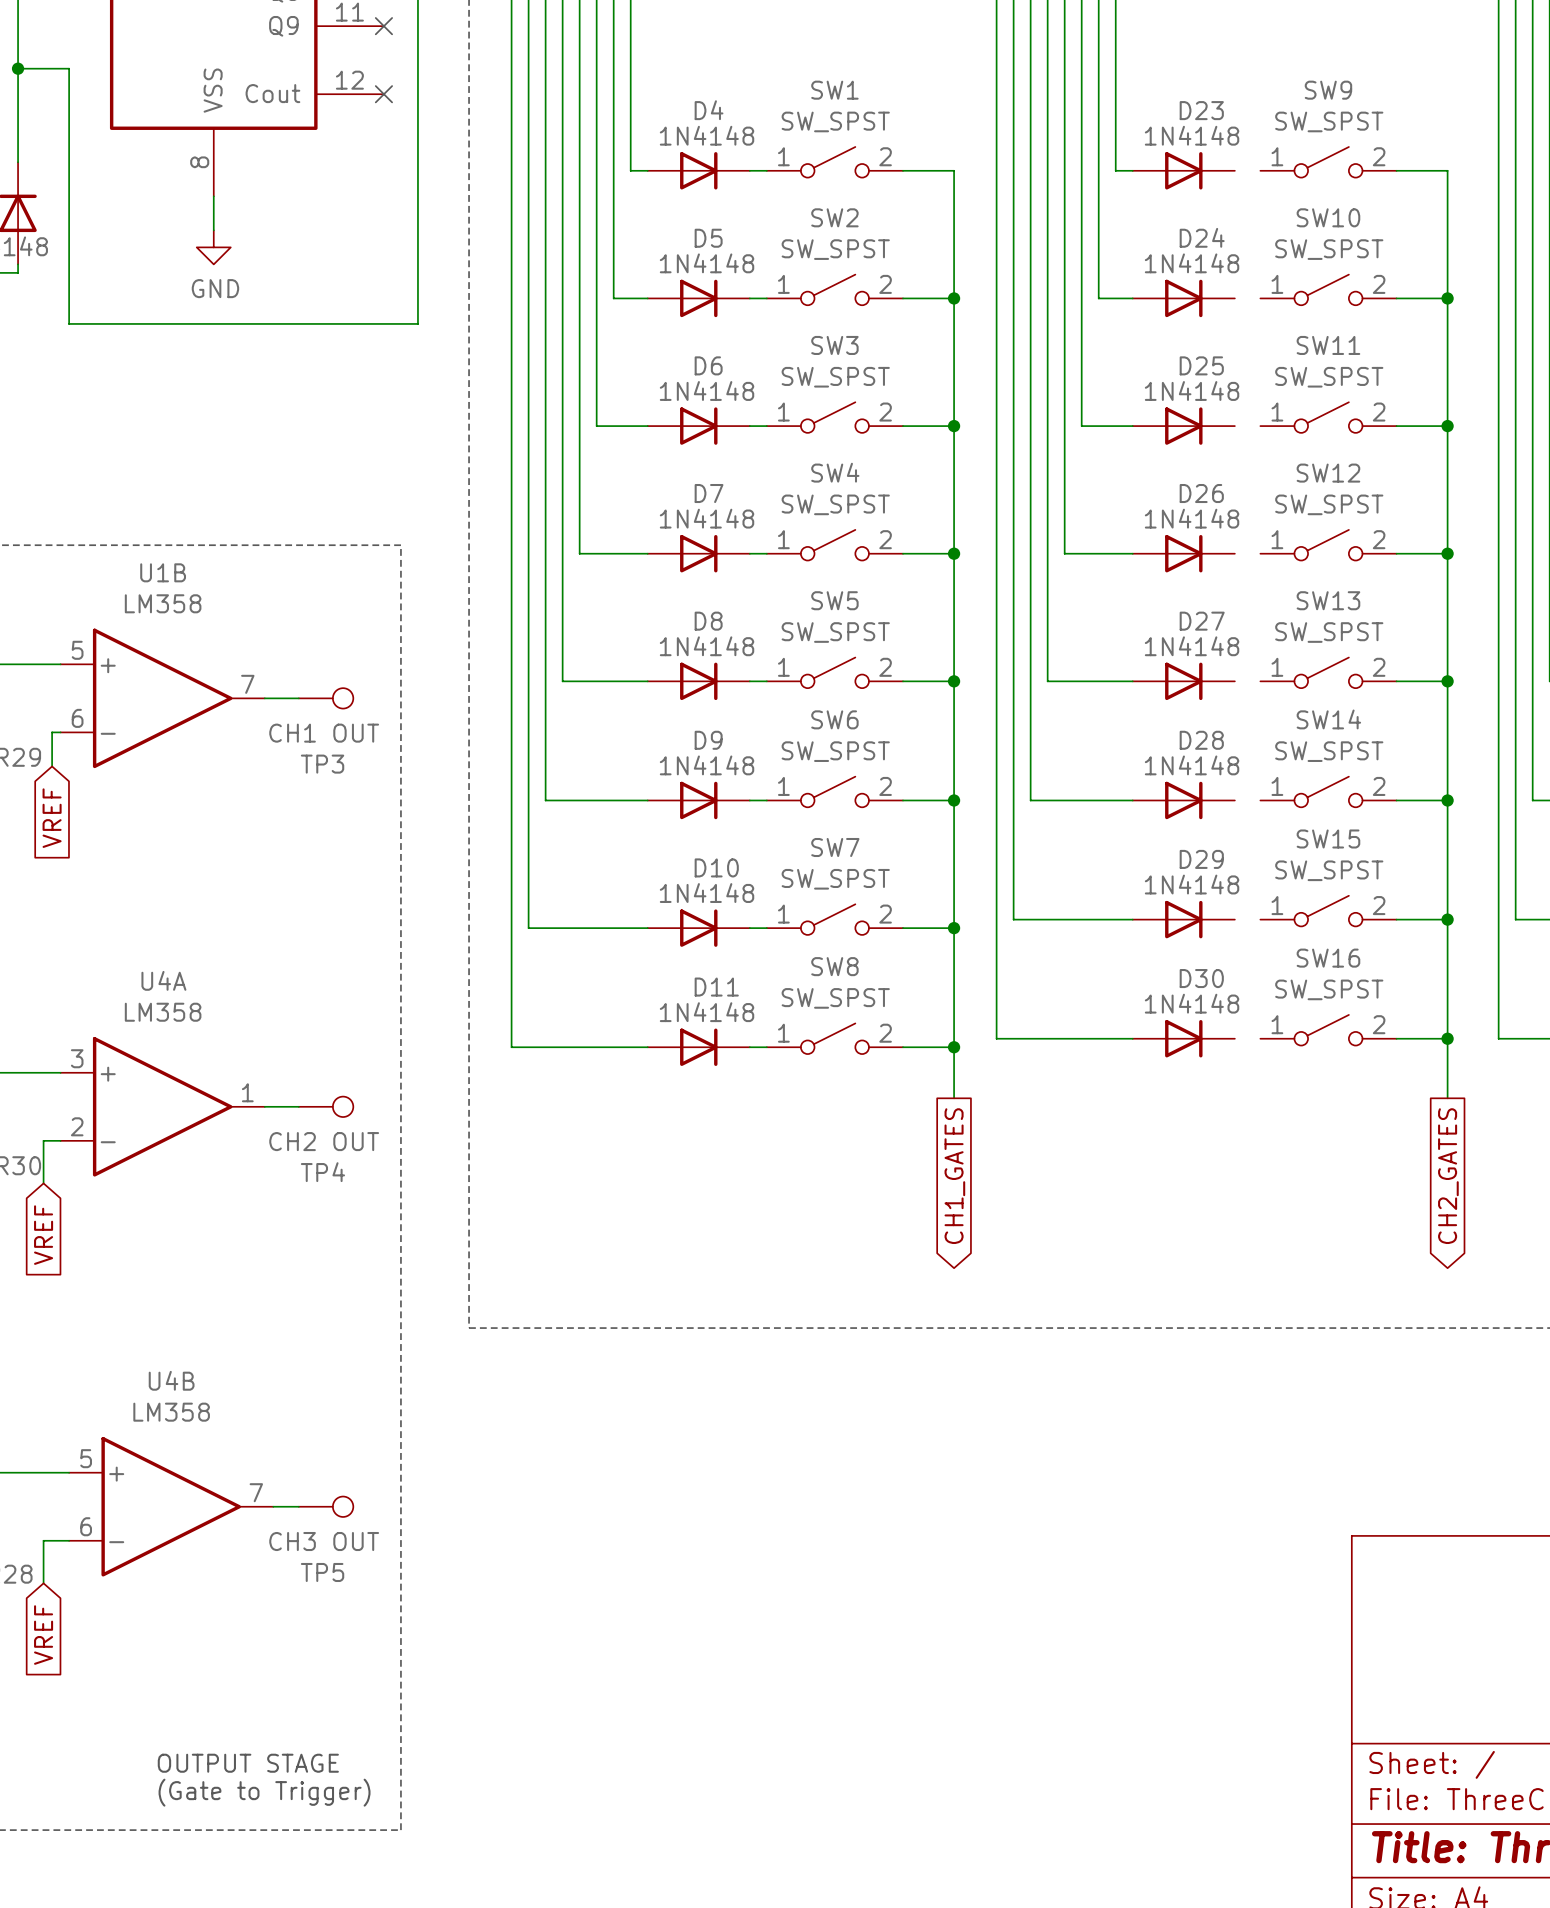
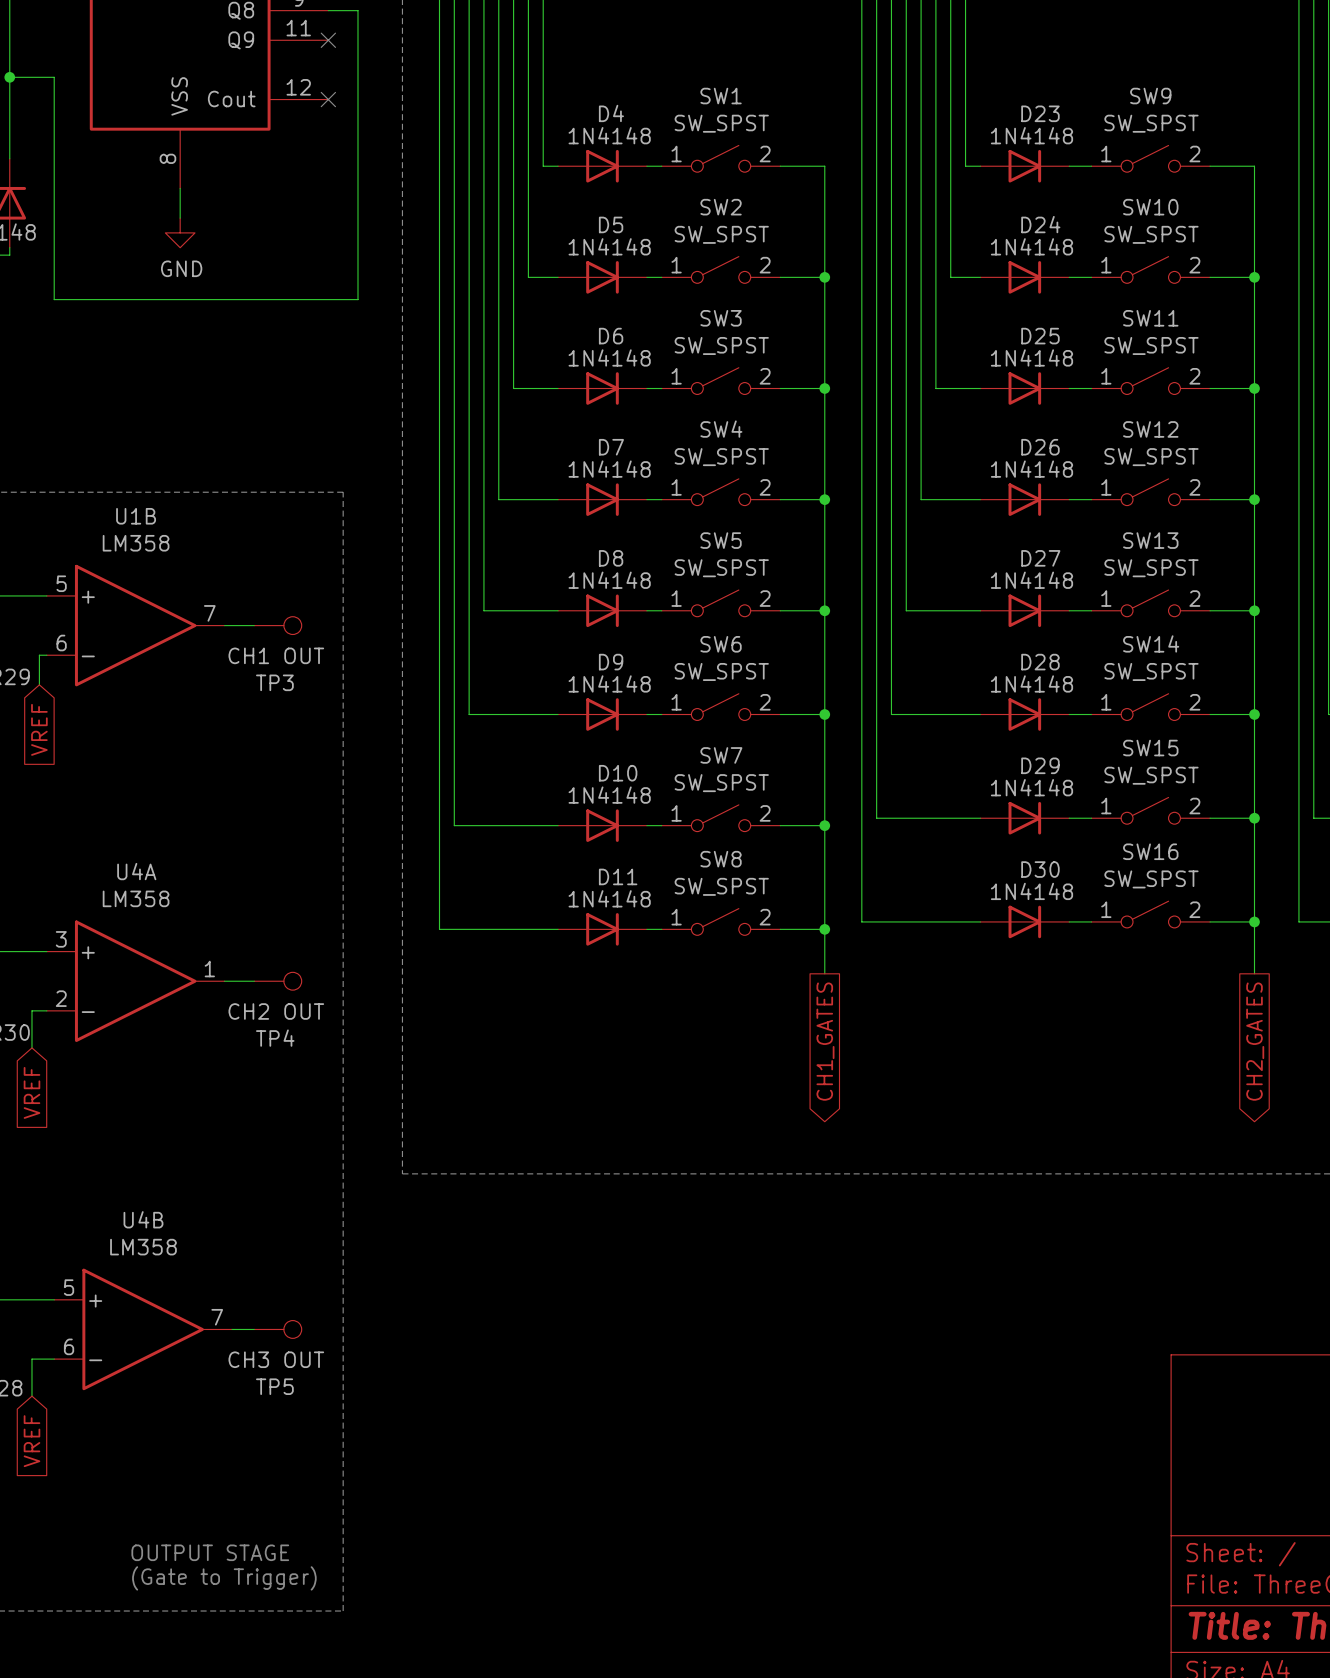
wire: none -> (1069, 166) (1091, 166)
wire: none -> (1069, 277) (1091, 277)
wire: none -> (1069, 388) (1091, 388)
wire: none -> (1069, 499) (1091, 499)
wire: none -> (1069, 610) (1091, 610)
wire: none -> (1069, 714) (1091, 714)
wire: none -> (1069, 818) (1091, 818)
wire: none -> (1069, 921) (1091, 921)

